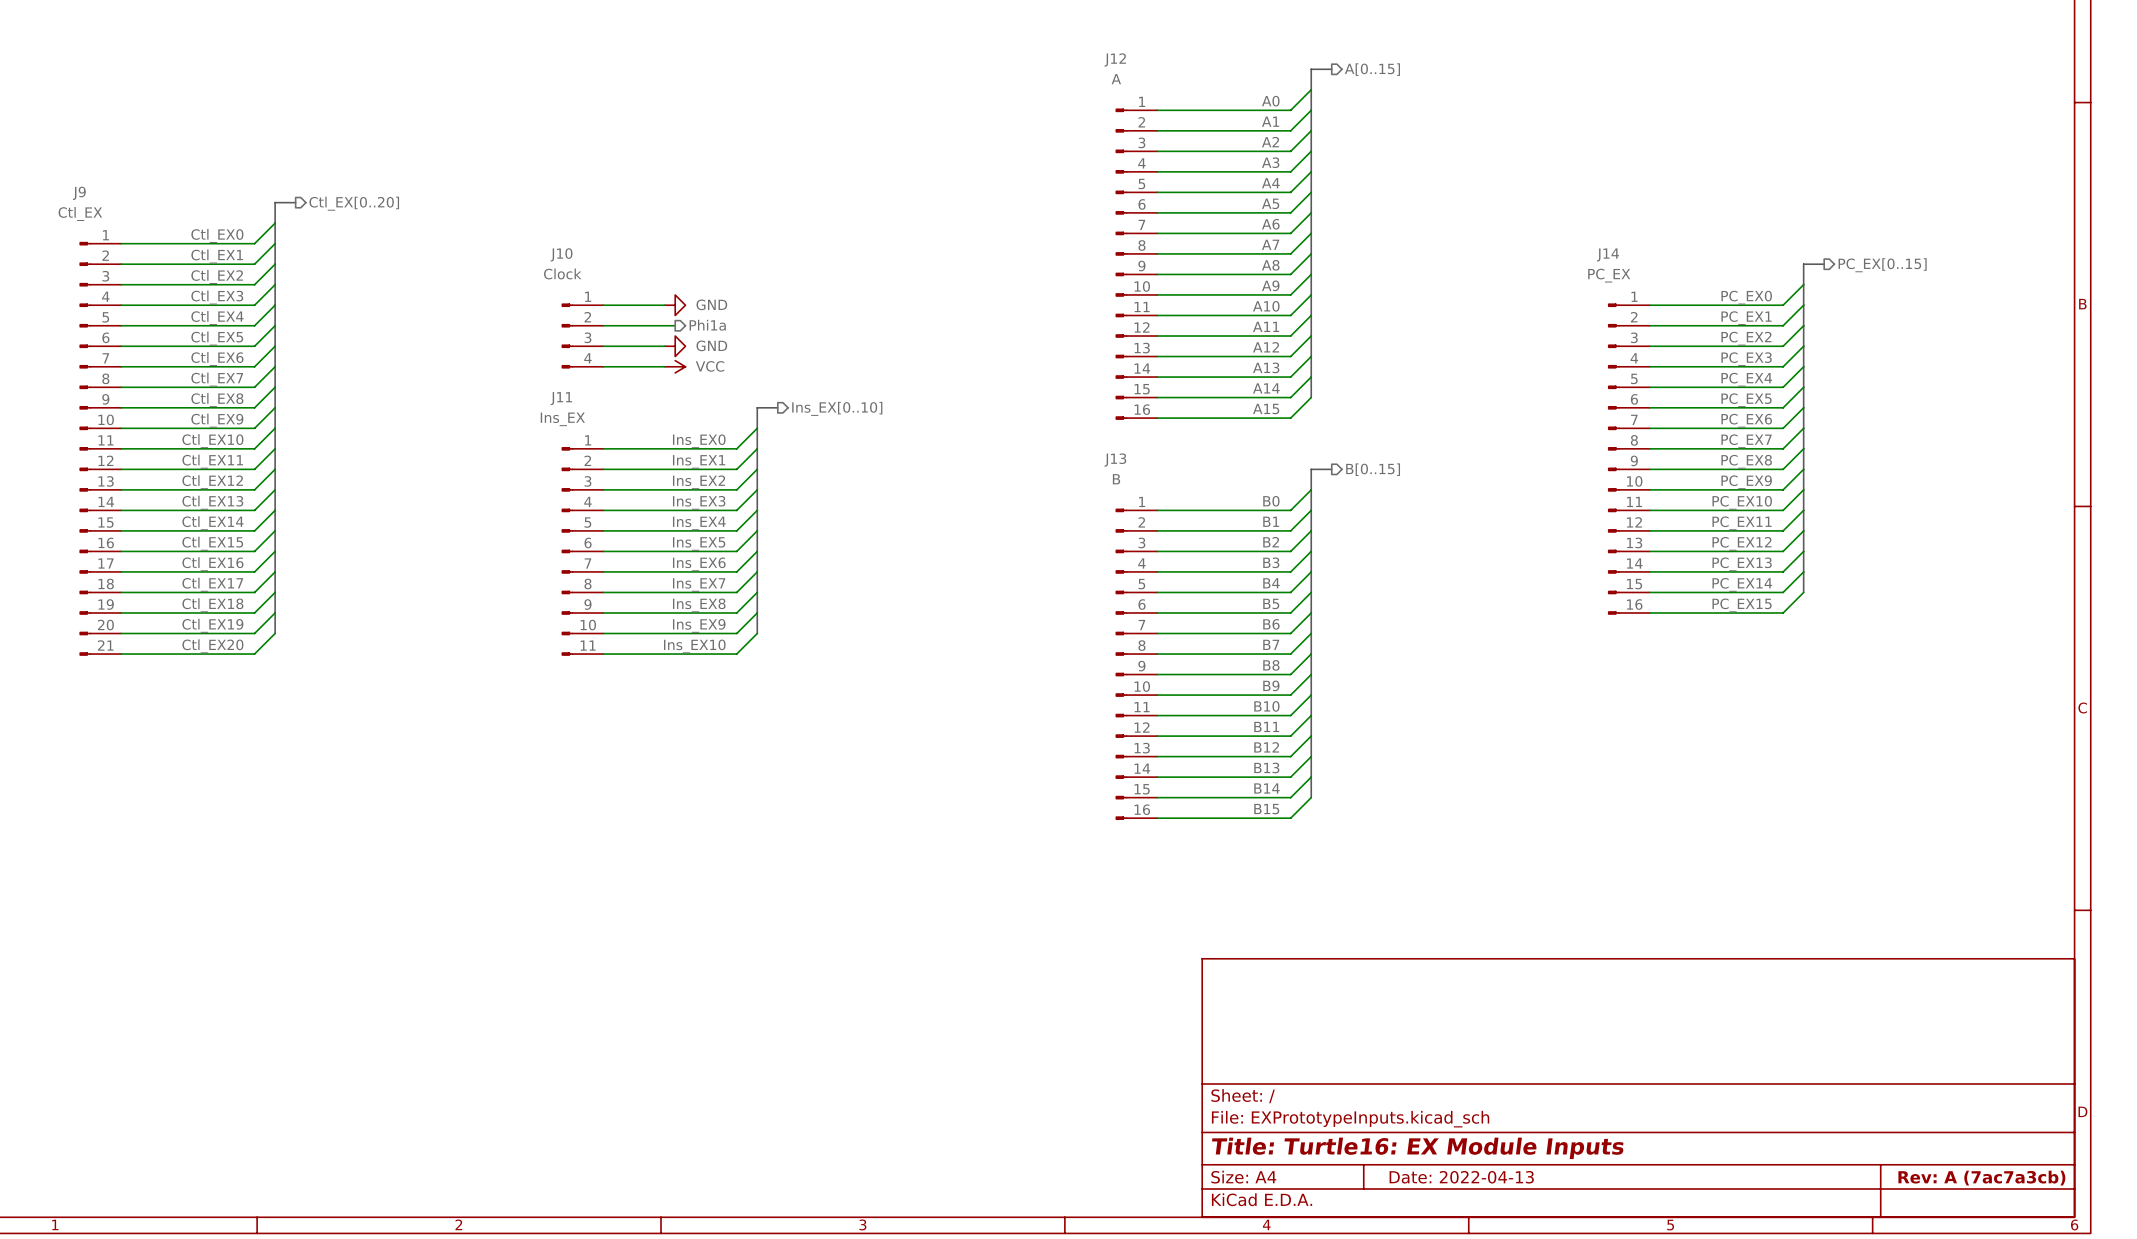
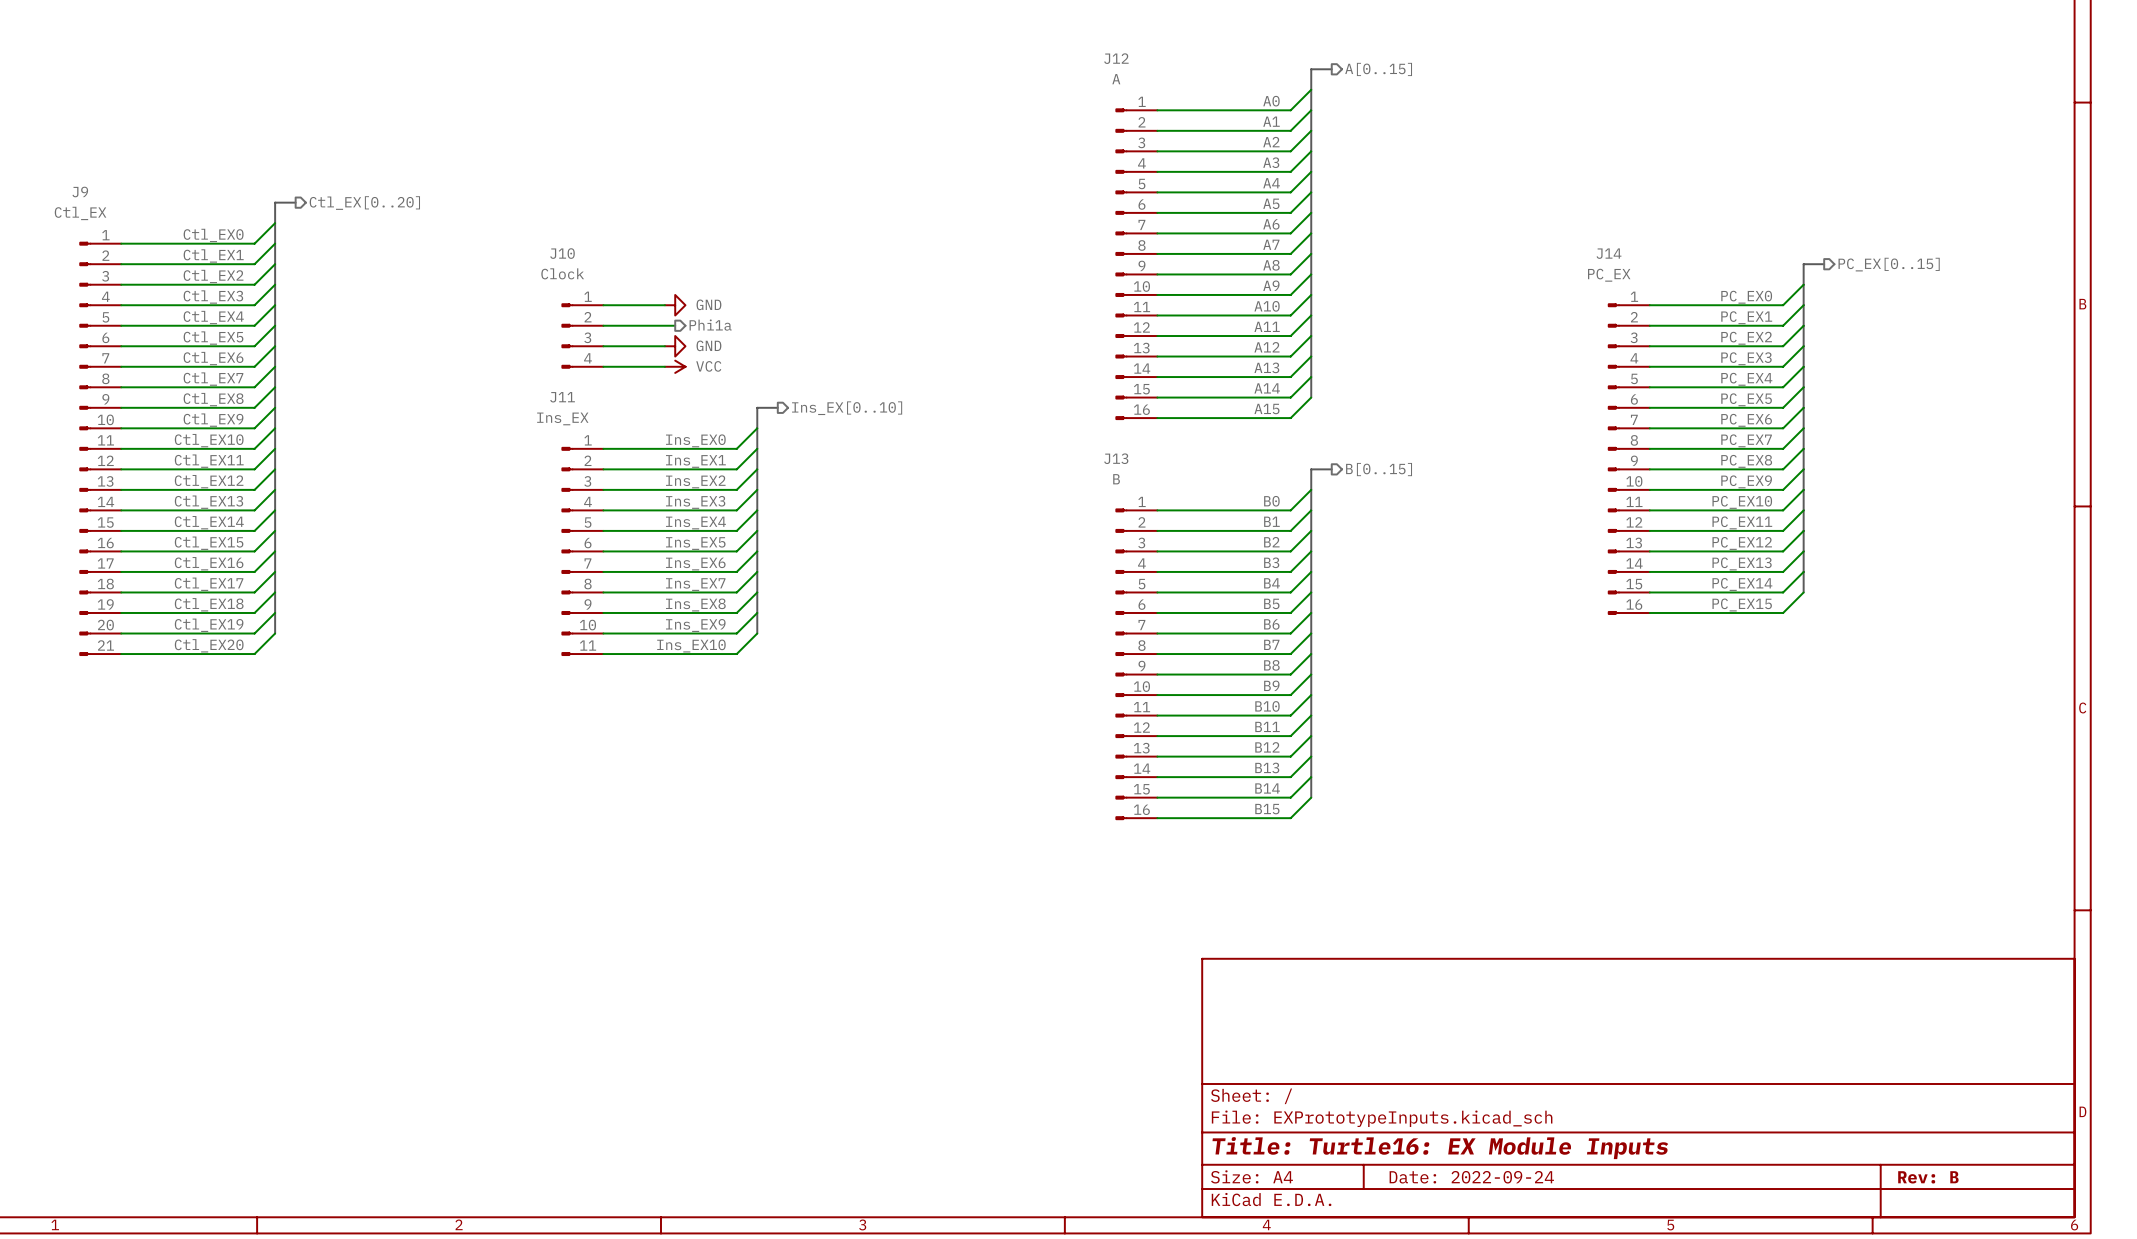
title block: Date: 2022-04-13 (1461, 1177) -> Date: 2022-09-24 (1471, 1177)
title block: Rev: A (7ac7a3cb) (1981, 1178) -> Rev: B (1928, 1177)

